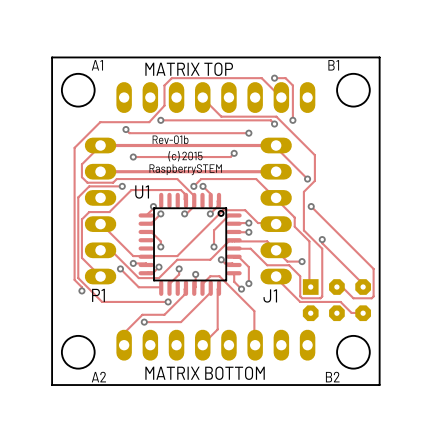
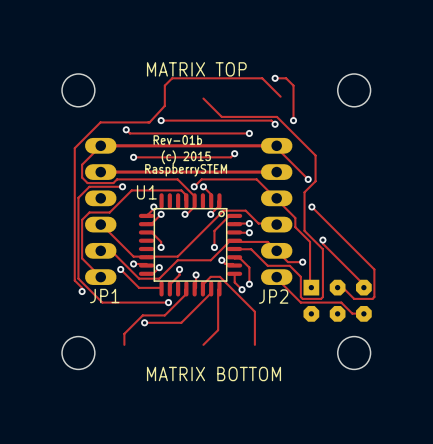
board edge: (52, 57) (379, 57) (379, 385) (52, 385) (52, 57) -> none
text: A1 (97, 65) -> none
text: B1 (333, 65) -> none
part: (215, 97) -> none
P1 name: P1 (98, 295) -> JP1 (104, 296)
J1 name: J1 (270, 295) -> JP2 (273, 296)
part: (215, 345) -> none
text: A2 (98, 377) -> none
text: B2 (332, 377) -> none

